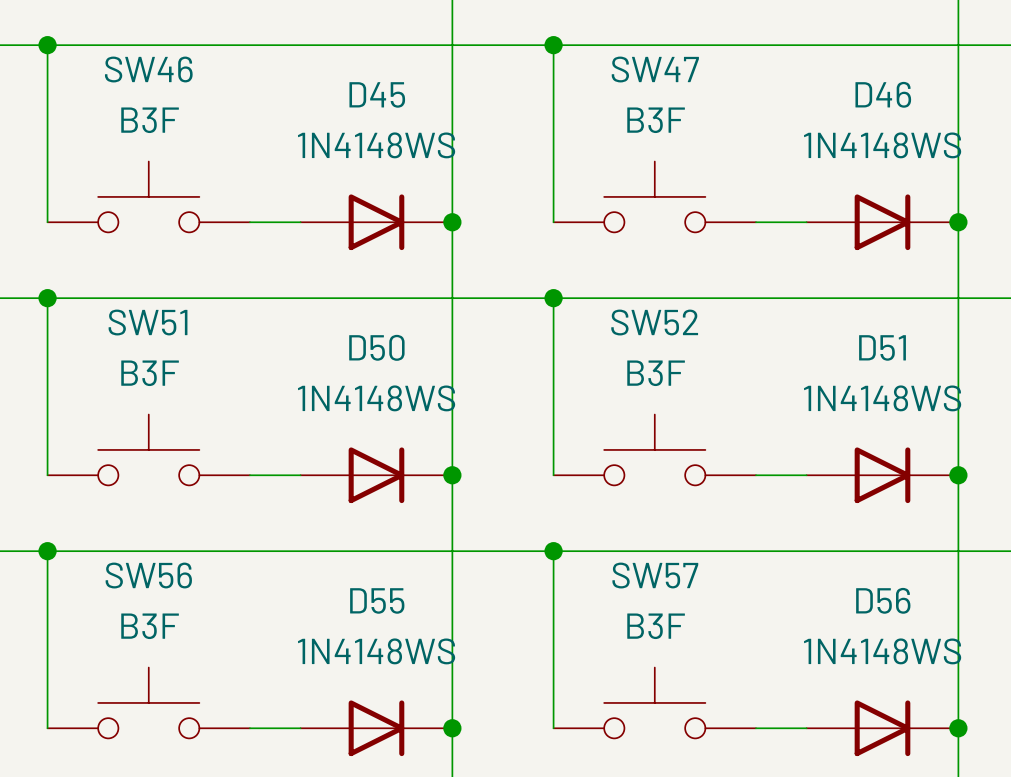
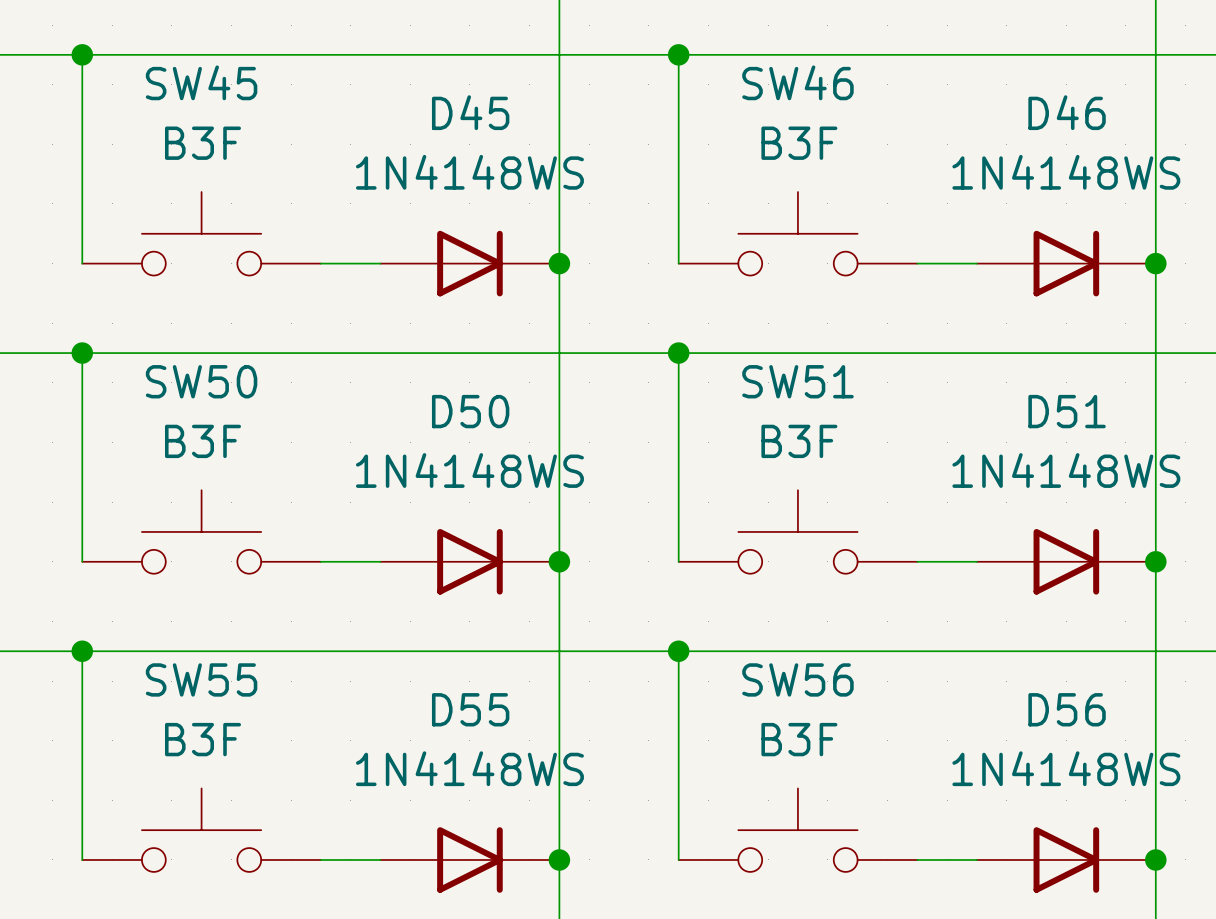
SW46 name: SW46 (148, 69) -> SW45 (201, 82)
SW47 name: SW47 (655, 69) -> SW46 (797, 82)
SW51 name: SW51 (148, 322) -> SW50 (201, 381)
SW52 name: SW52 (654, 322) -> SW51 (797, 381)
SW56 name: SW56 (148, 575) -> SW55 (201, 679)
SW57 name: SW57 (655, 575) -> SW56 (797, 679)

